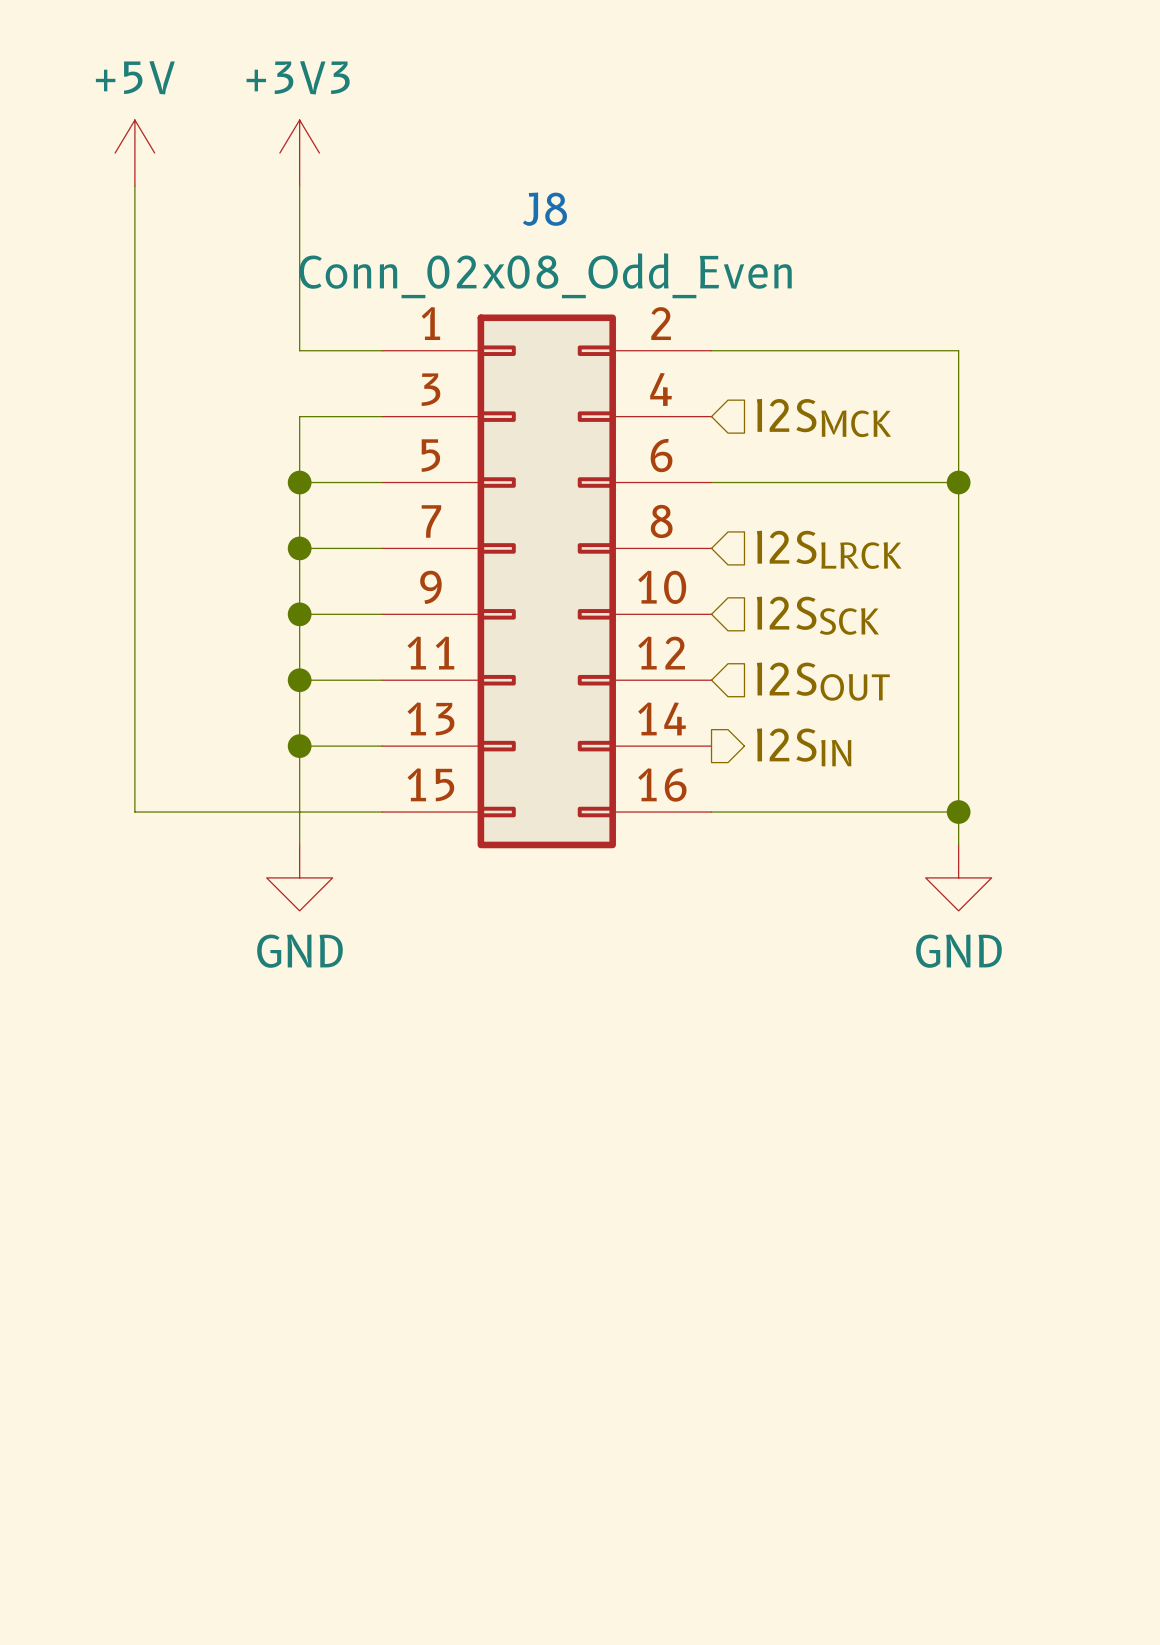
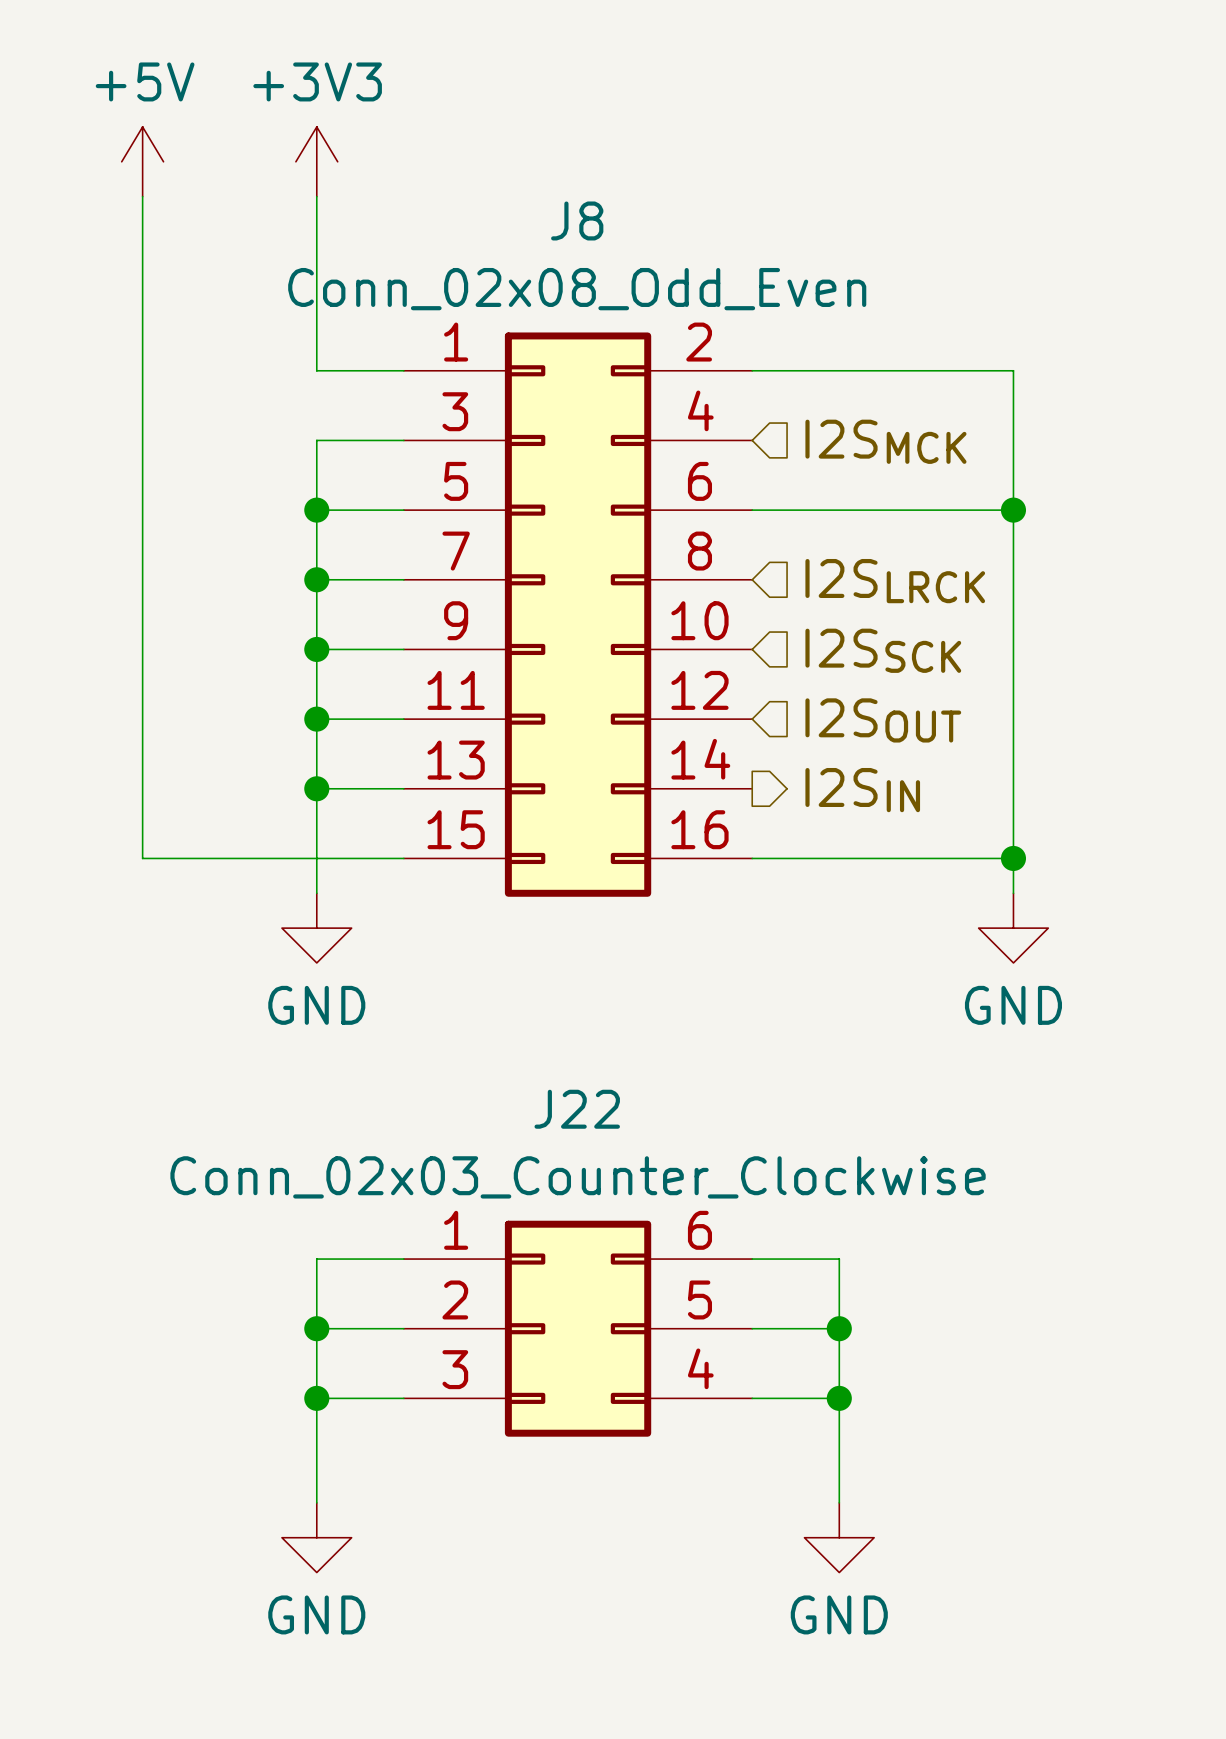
wire: none -> (403, 1259) (316, 1259) (316, 1502)
wire: none -> (752, 1259) (839, 1259) (839, 1502)
wire: none -> (316, 1328) (403, 1328)
junction: none -> (316, 1328)
J22: none -> Conn_02x03_Counter_Clockwise (578, 1328)
wire: none -> (752, 1328) (839, 1328)
junction: none -> (839, 1328)
wire: none -> (316, 1398) (403, 1398)
junction: none -> (316, 1398)
wire: none -> (752, 1398) (839, 1398)
junction: none -> (839, 1398)
power symbol: none -> GND (316, 1537)
power symbol: none -> GND (839, 1537)

